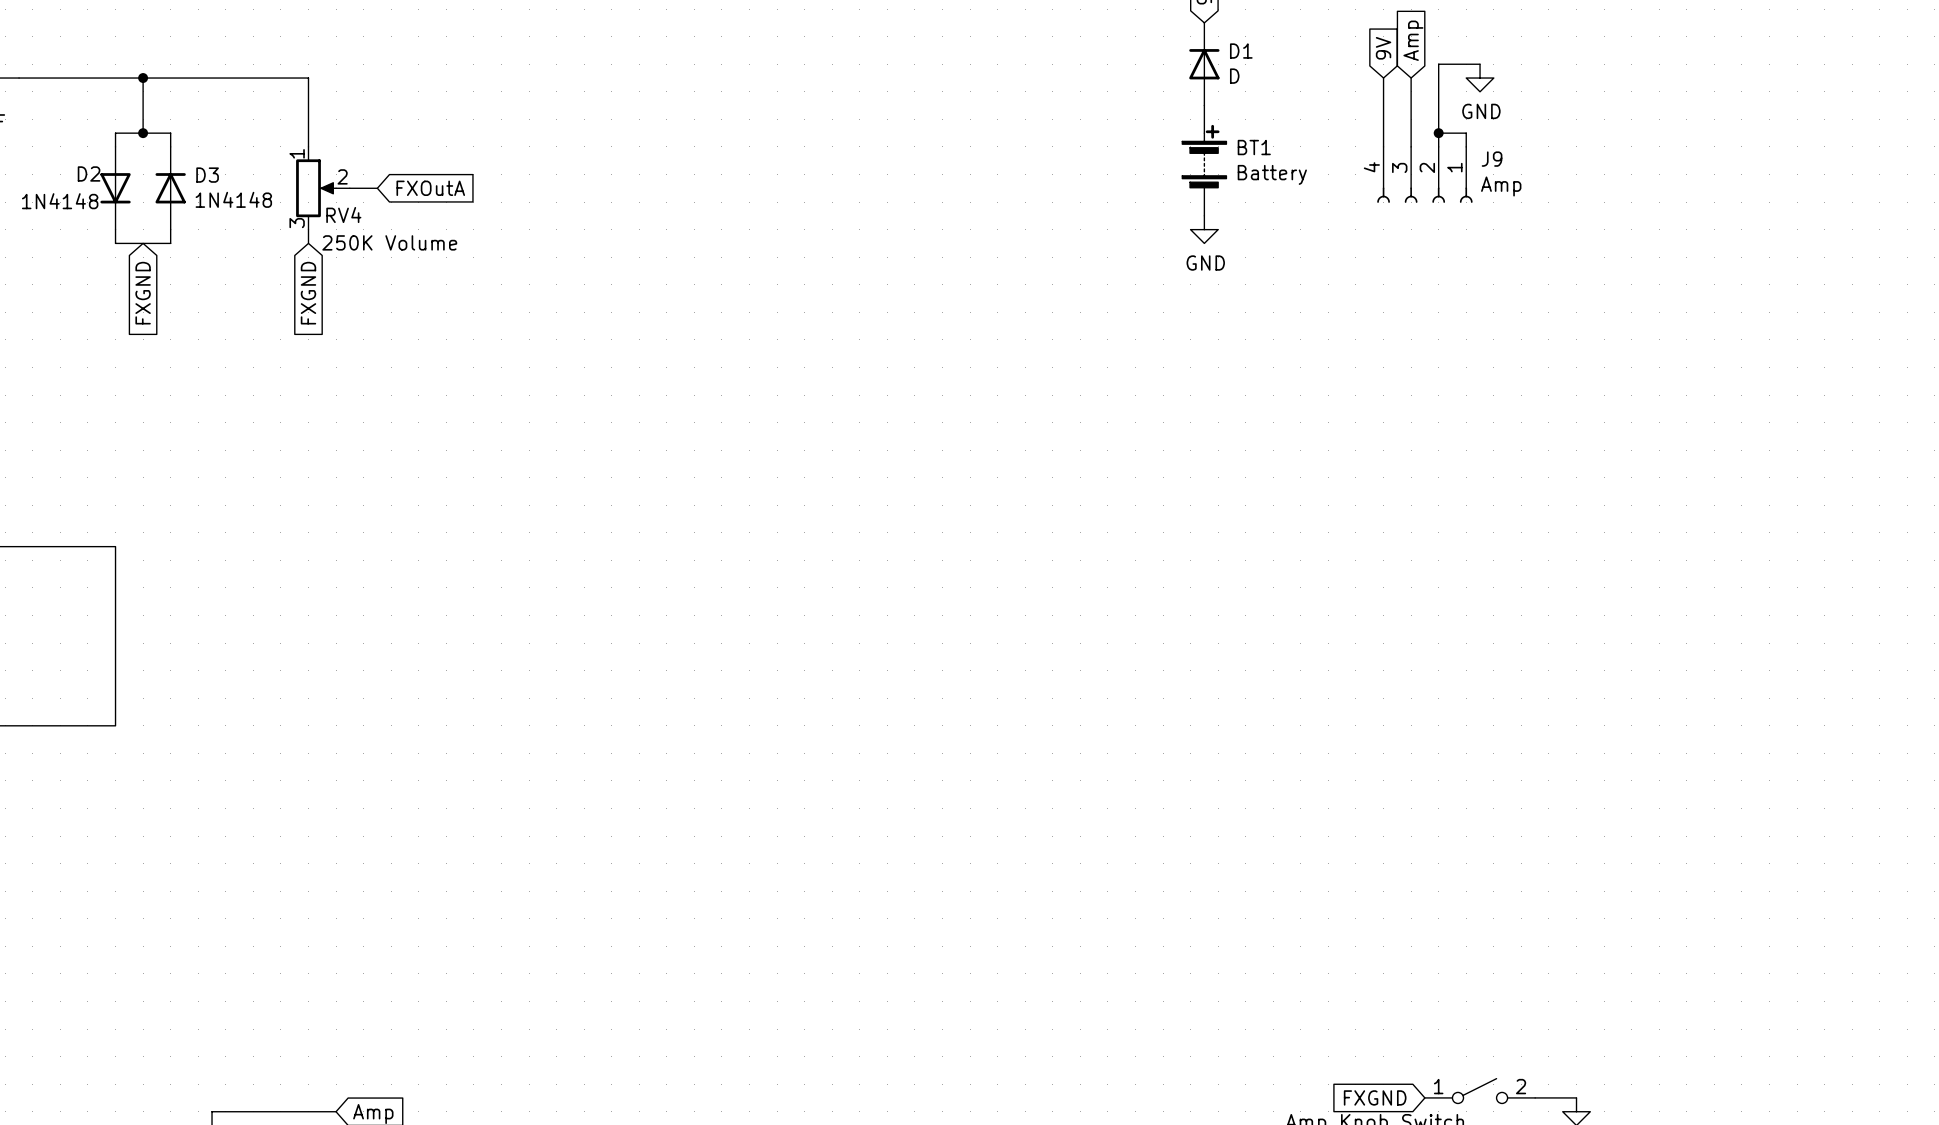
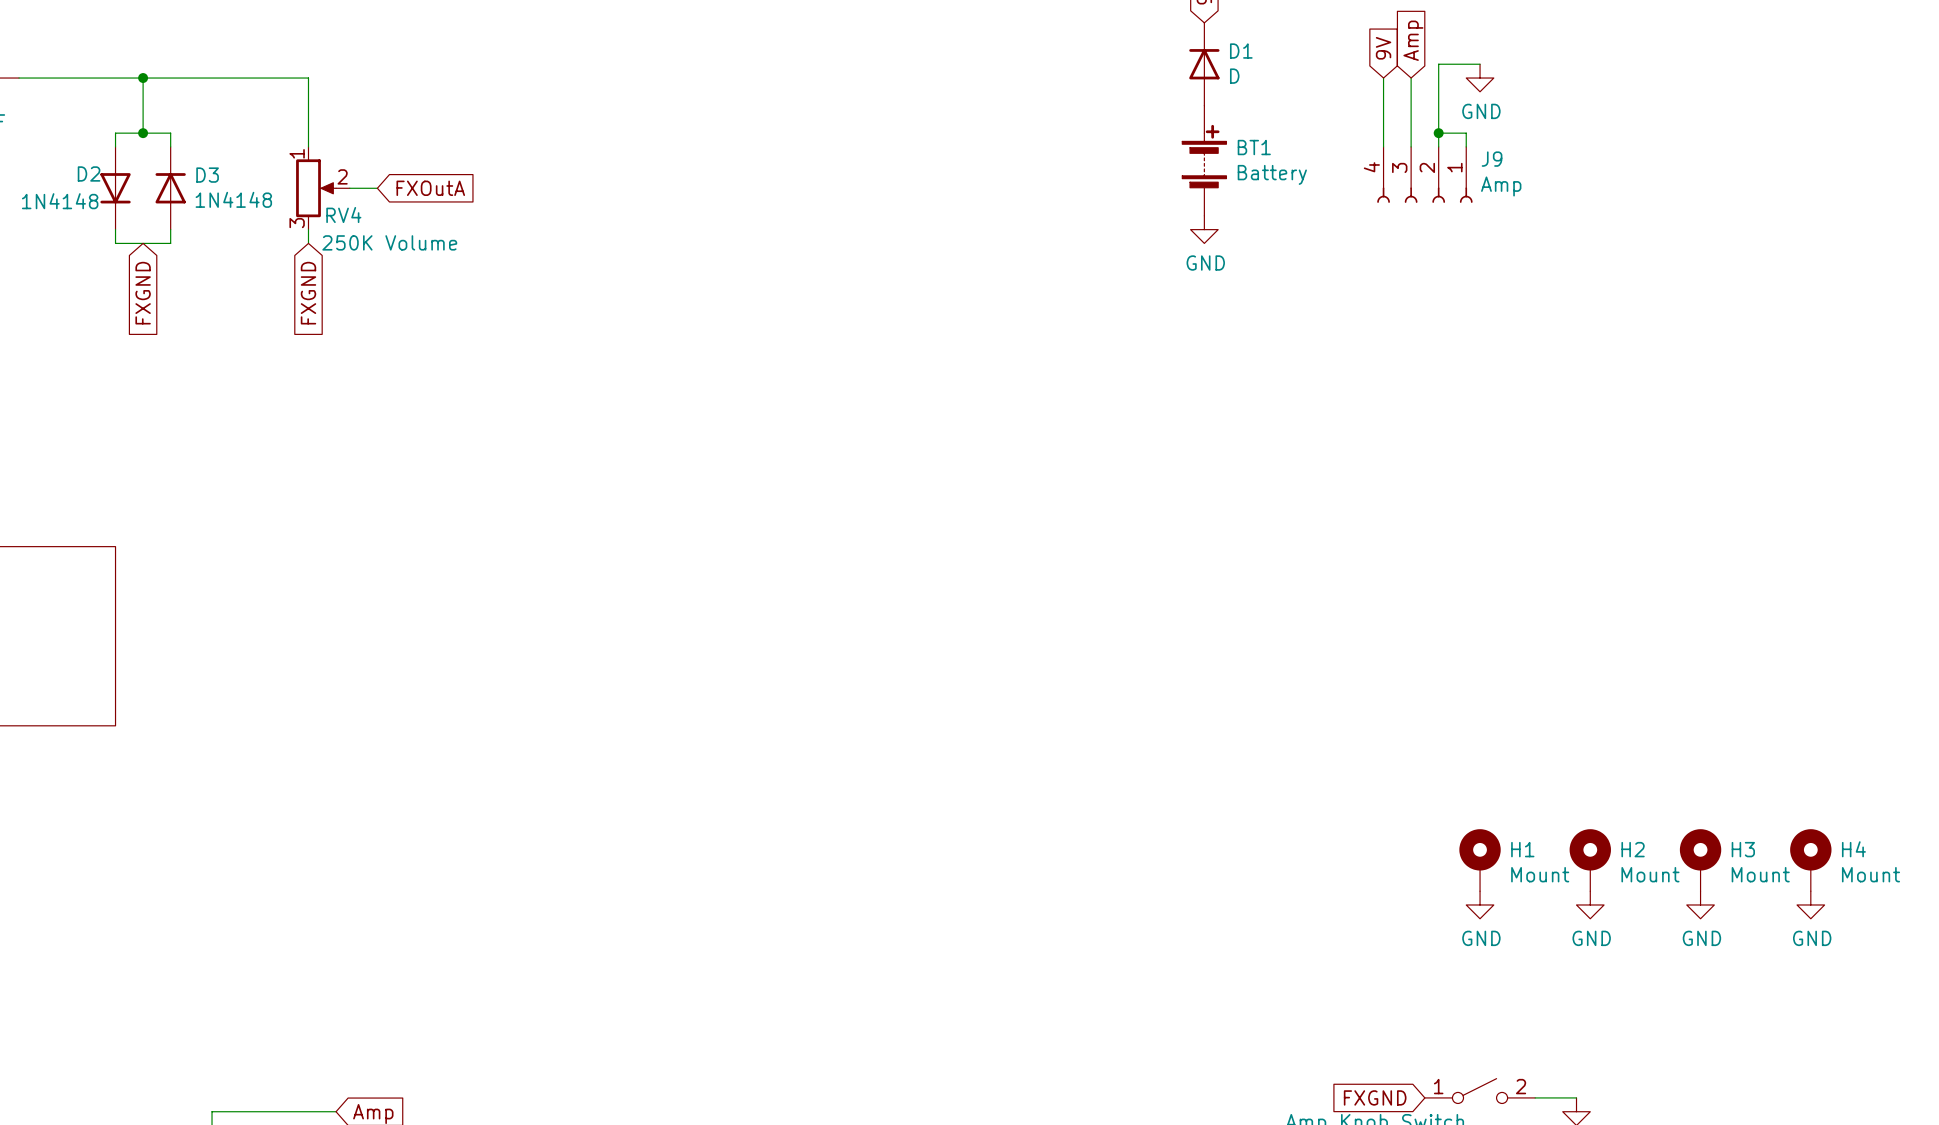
H1: none -> Mount (1480, 860)
H2: none -> Mount (1590, 860)
H3: none -> Mount (1700, 860)
H4: none -> Mount (1810, 860)
power symbol: none -> GND (1480, 904)
power symbol: none -> GND (1590, 904)
power symbol: none -> GND (1700, 904)
power symbol: none -> GND (1810, 904)

